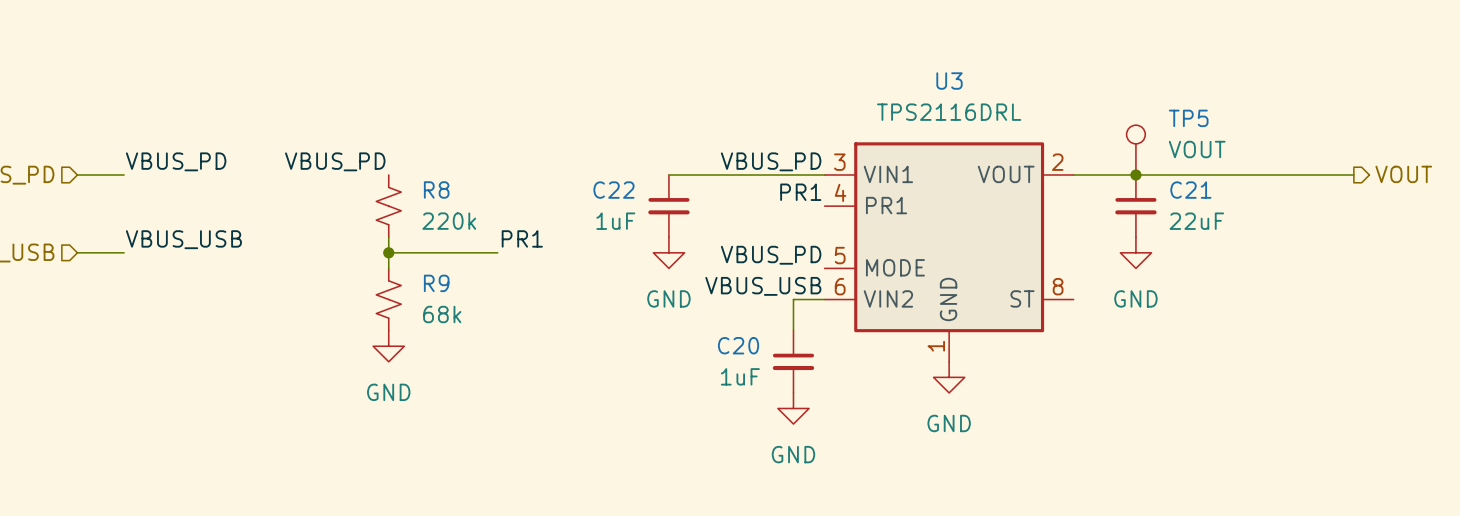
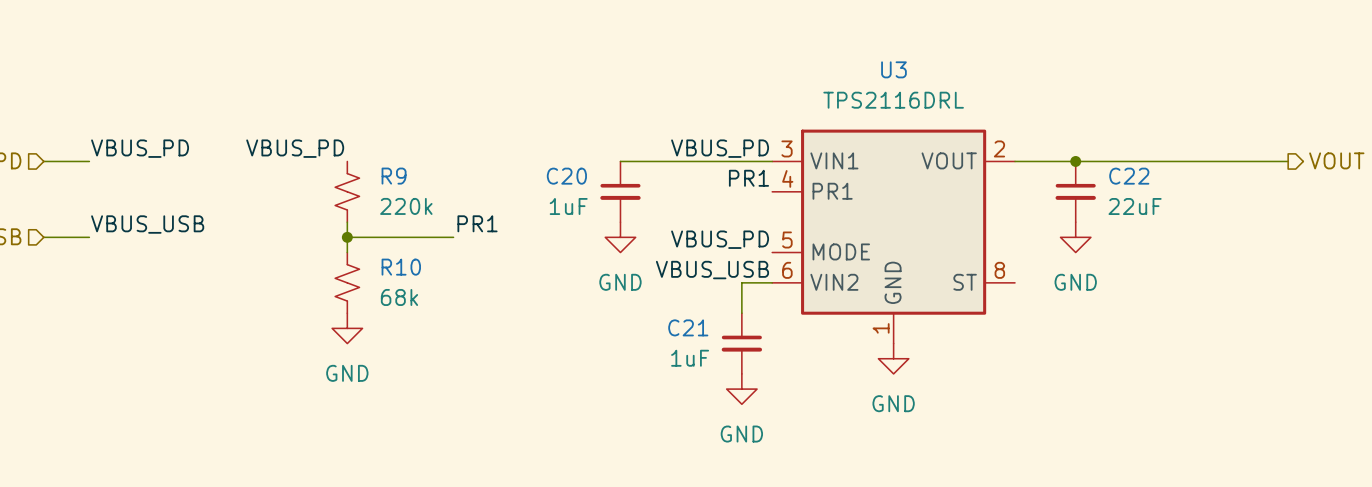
TP5: VOUT (1135, 150) -> none
R8 name: R8 (436, 189) -> R9 (394, 176)
C22 name: C22 (613, 190) -> C20 (566, 176)
C21 name: C21 (1190, 190) -> C22 (1129, 176)
R9 name: R9 (436, 283) -> R10 (401, 267)
C20 name: C20 (738, 345) -> C21 (688, 327)

